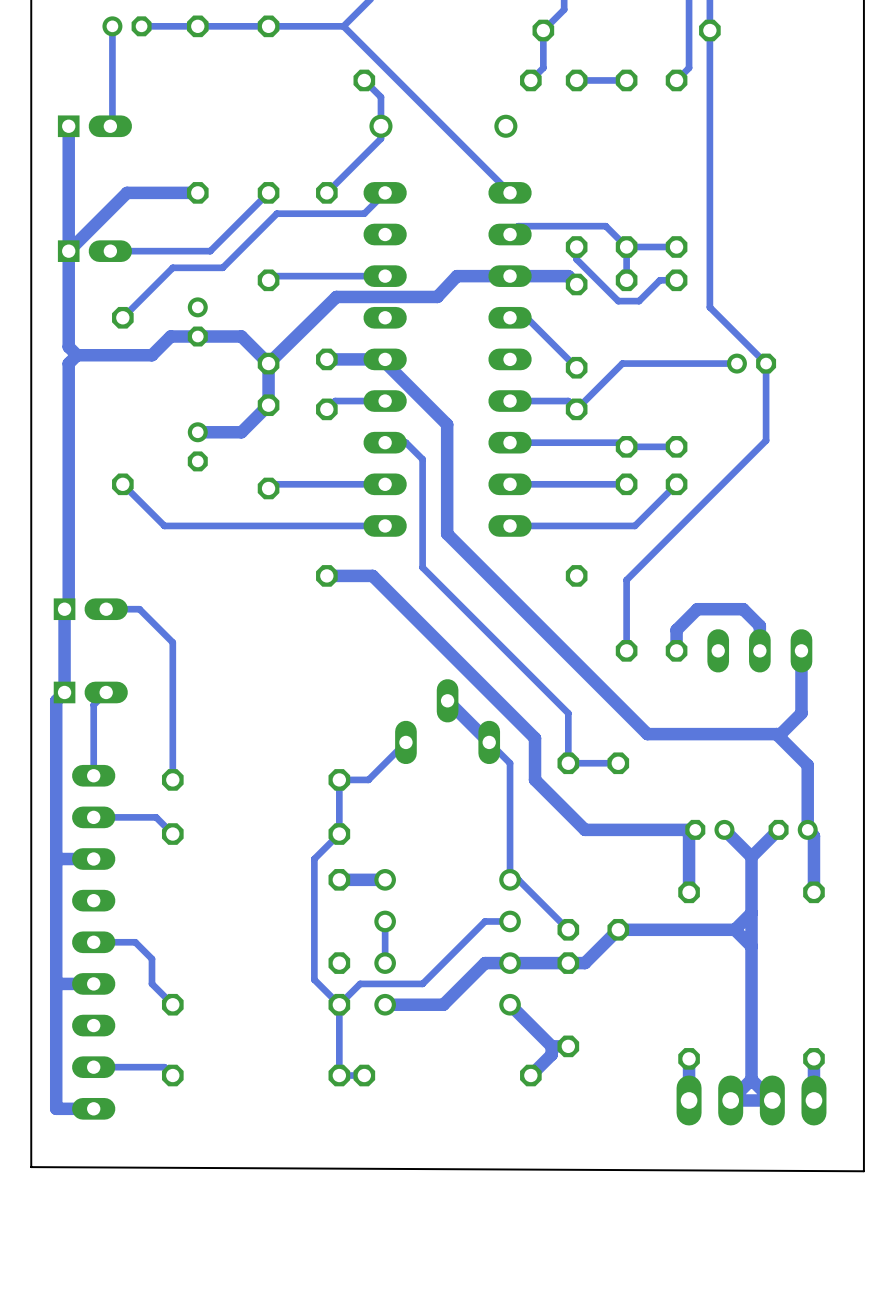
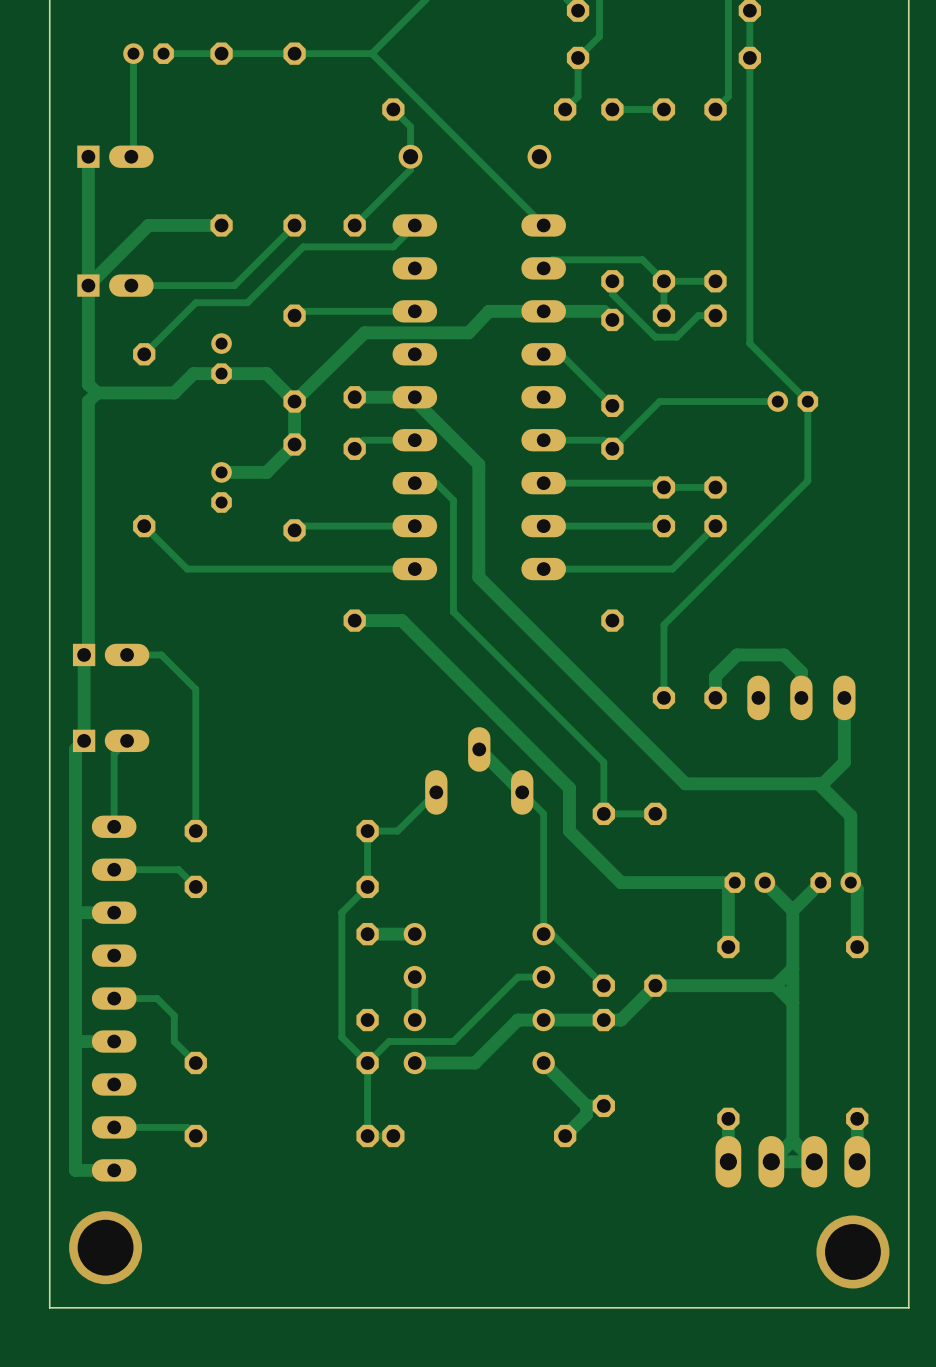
board edge: (31, 1167) (863, 1171) -> (49, 1230) (49, 1307) (908, 1307) (908, 1234)
via: none -> (105, 1247)
via: none -> (852, 1251)

